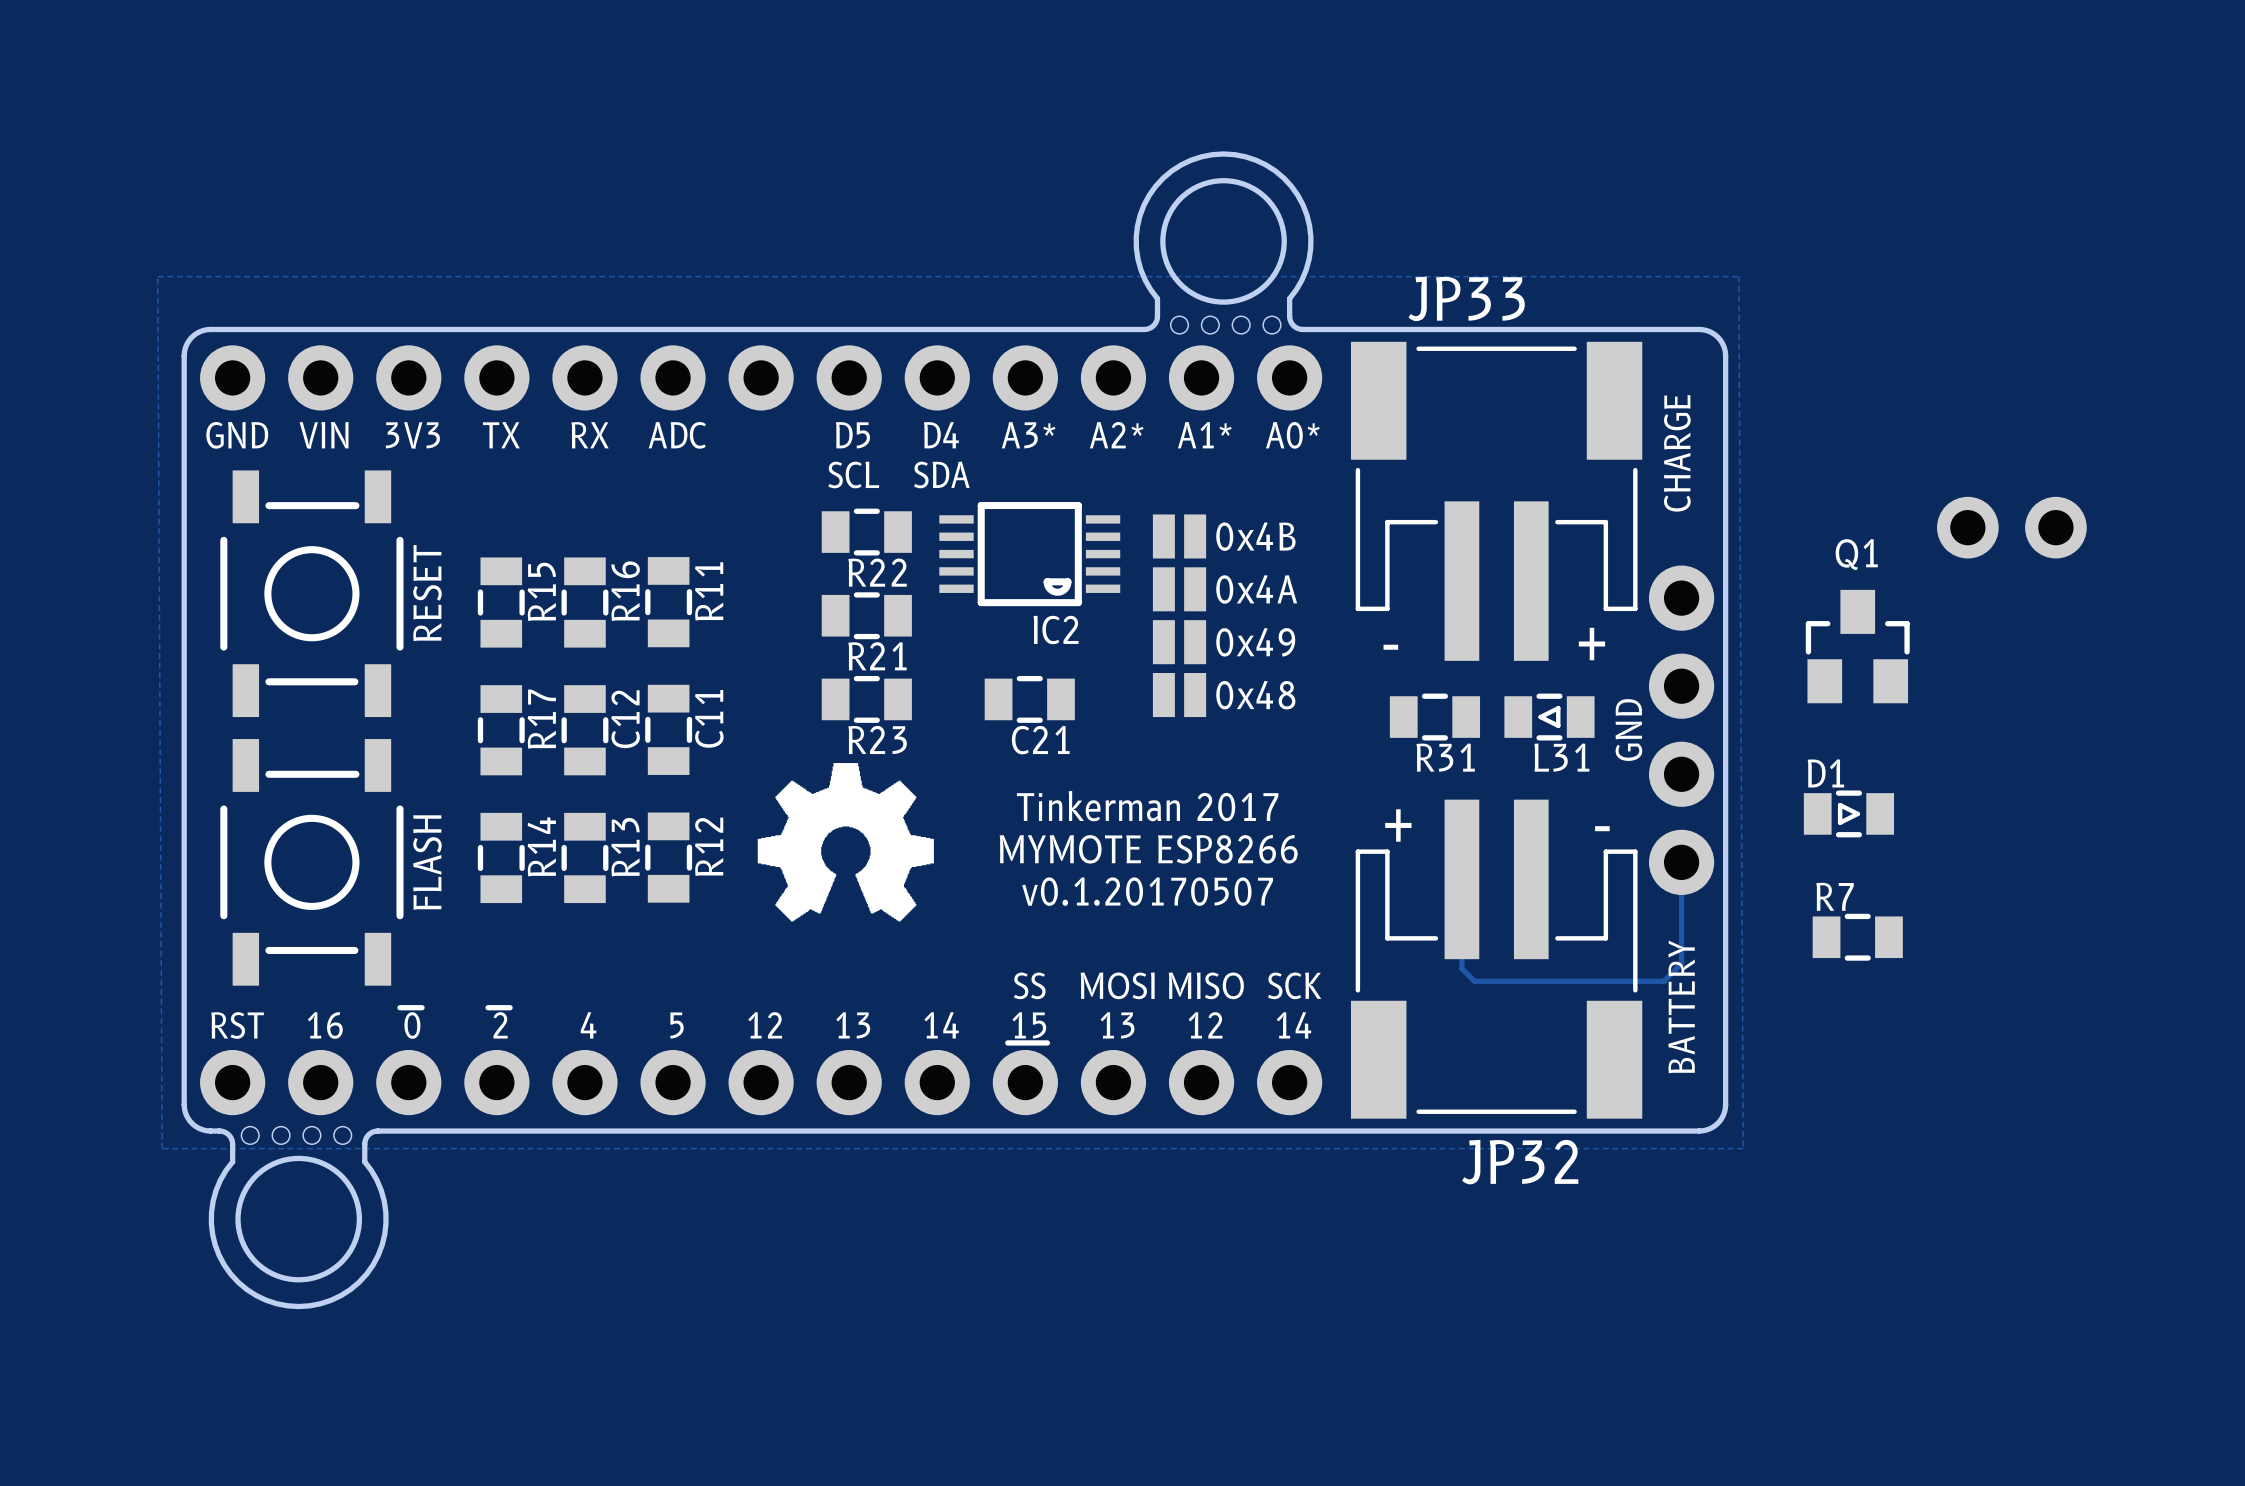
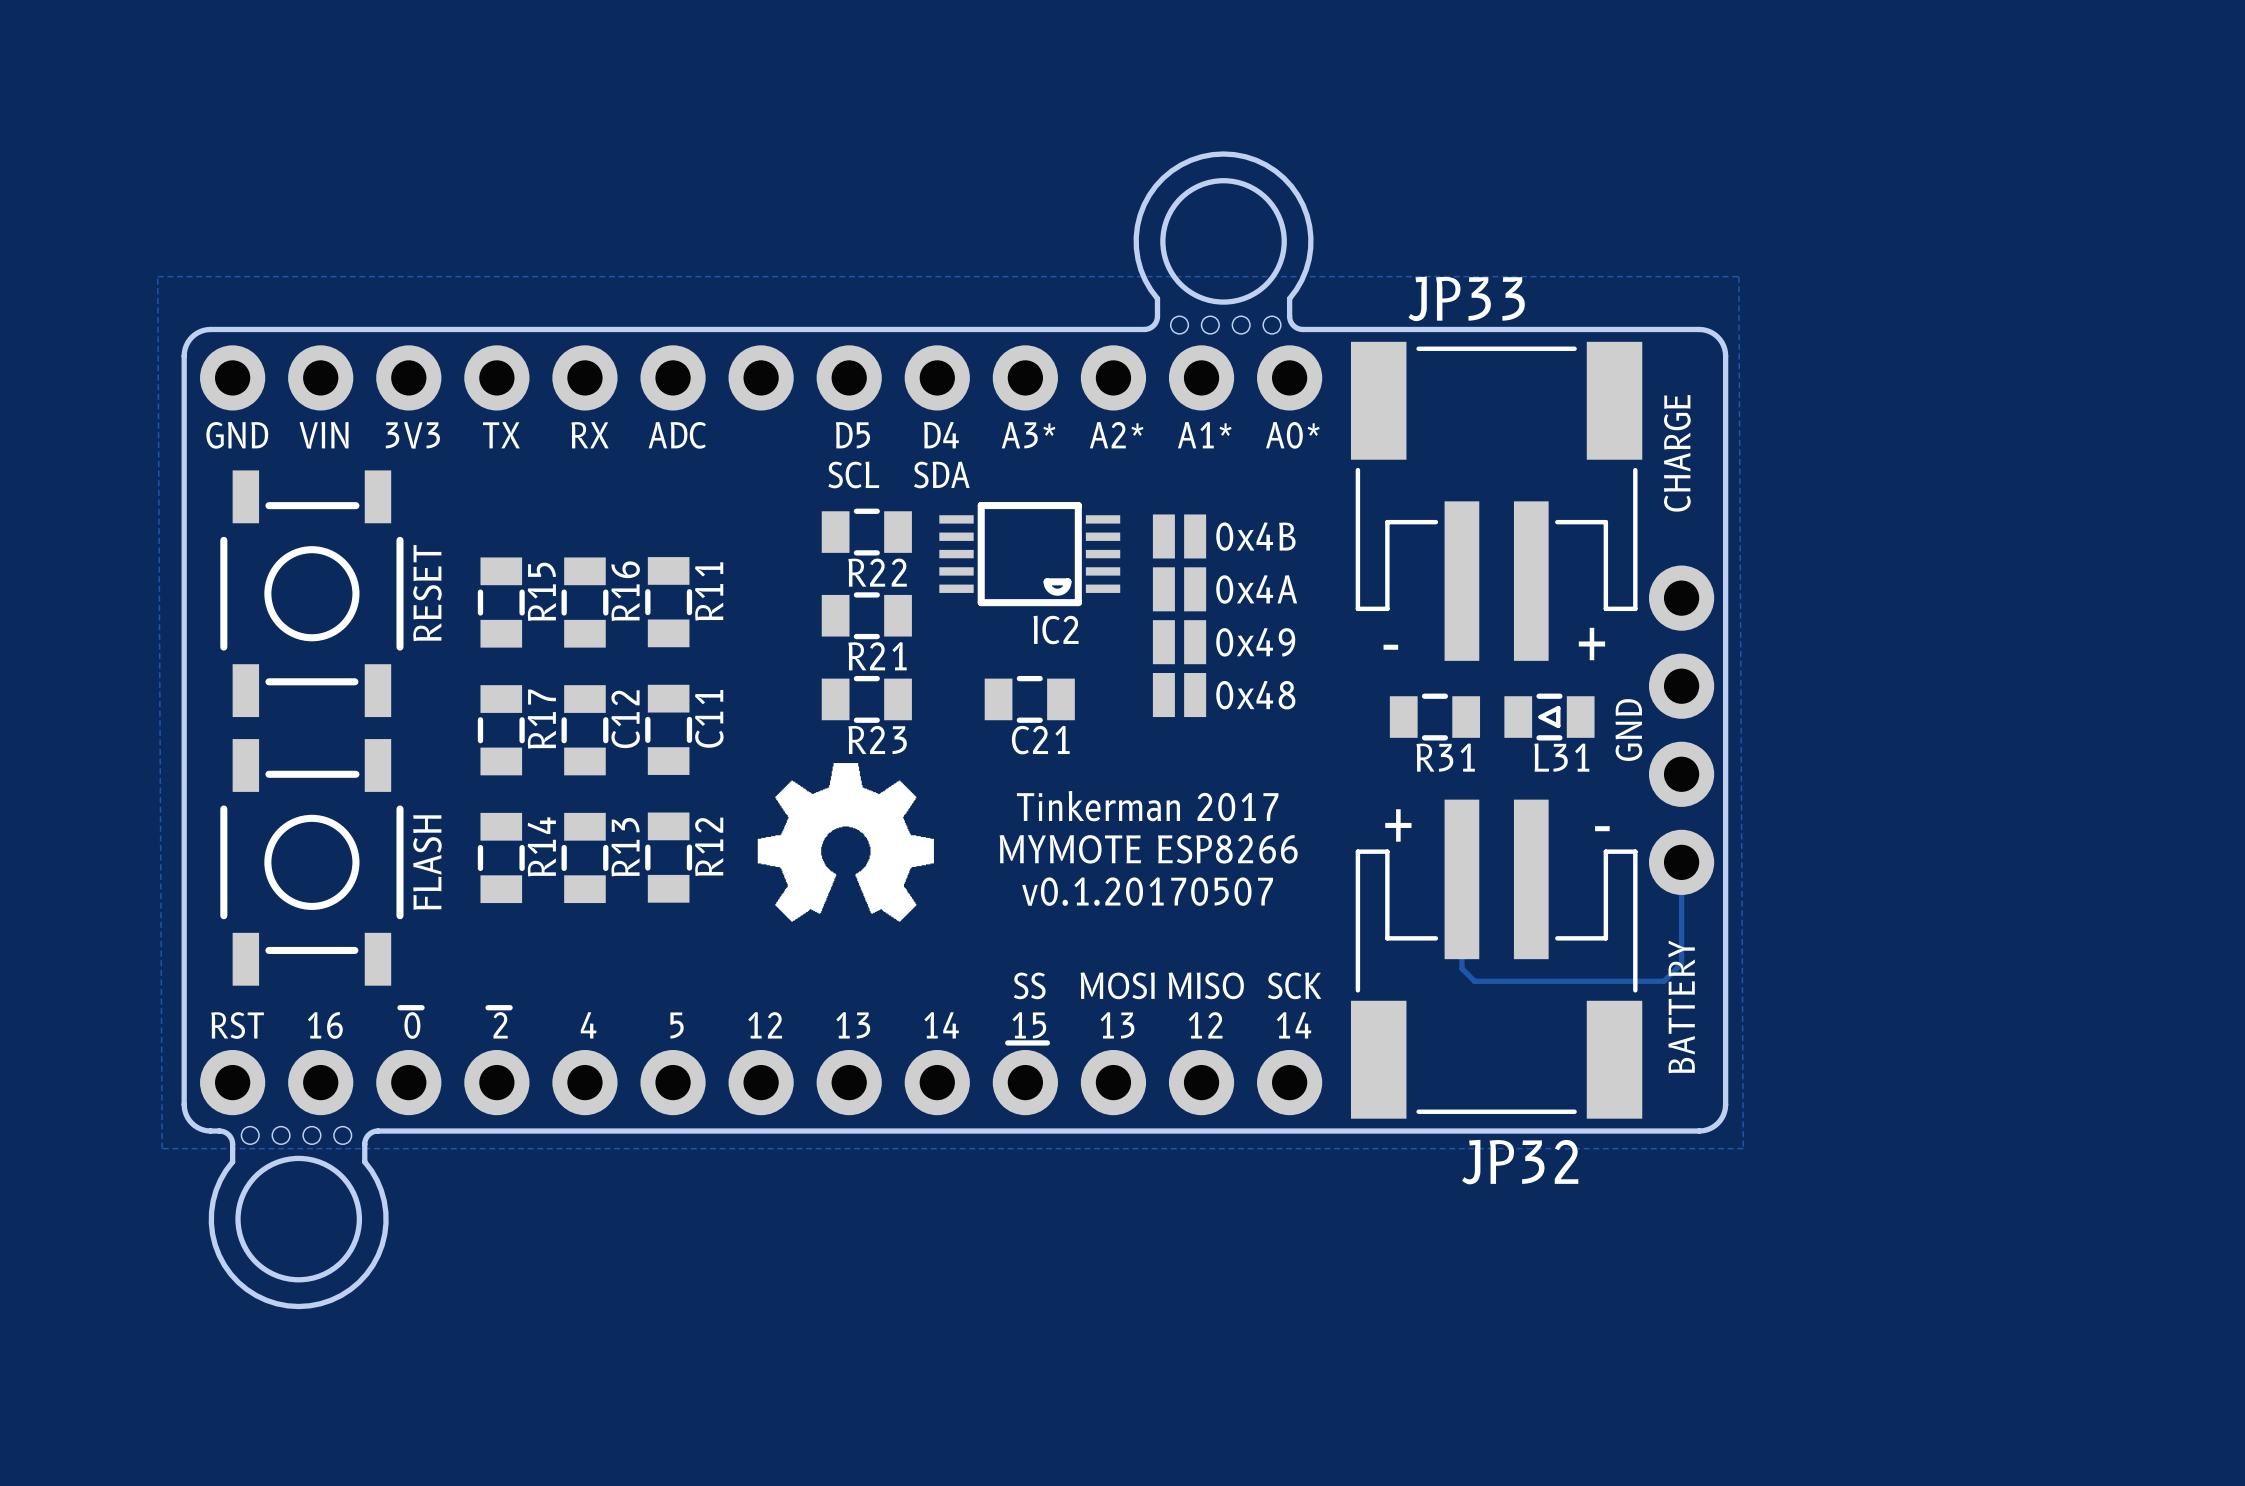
part: (2011, 527) -> none
Q1: (1857, 646) -> none
D1: (1848, 813) -> none
R7: (1857, 937) -> none

